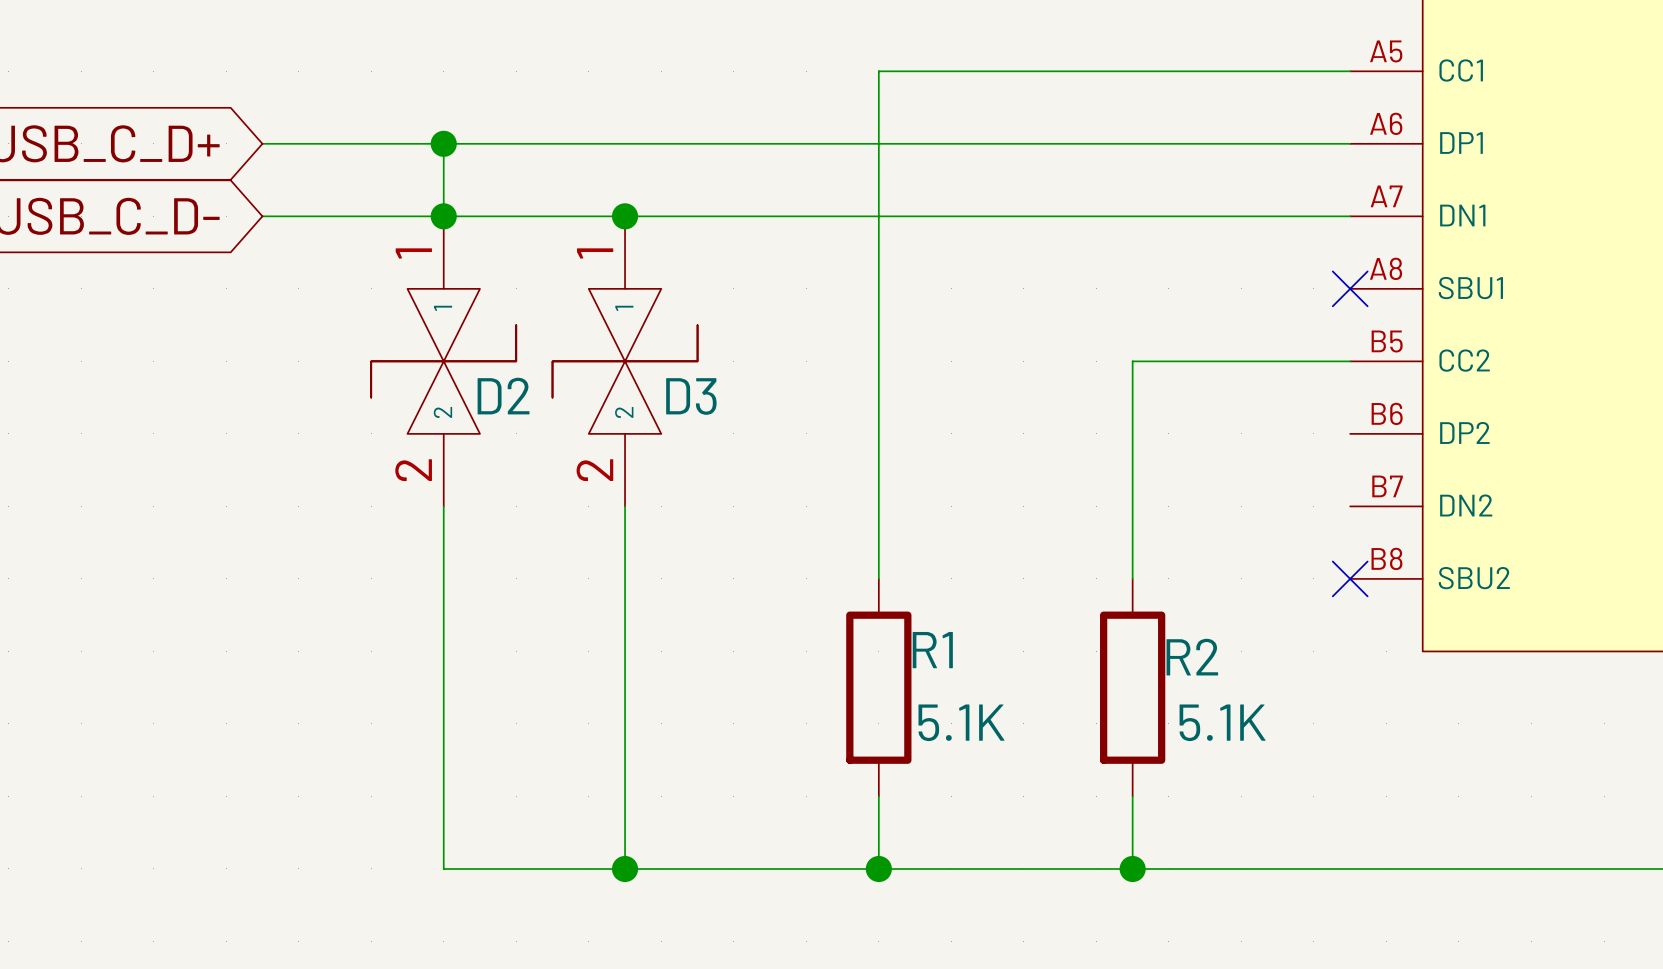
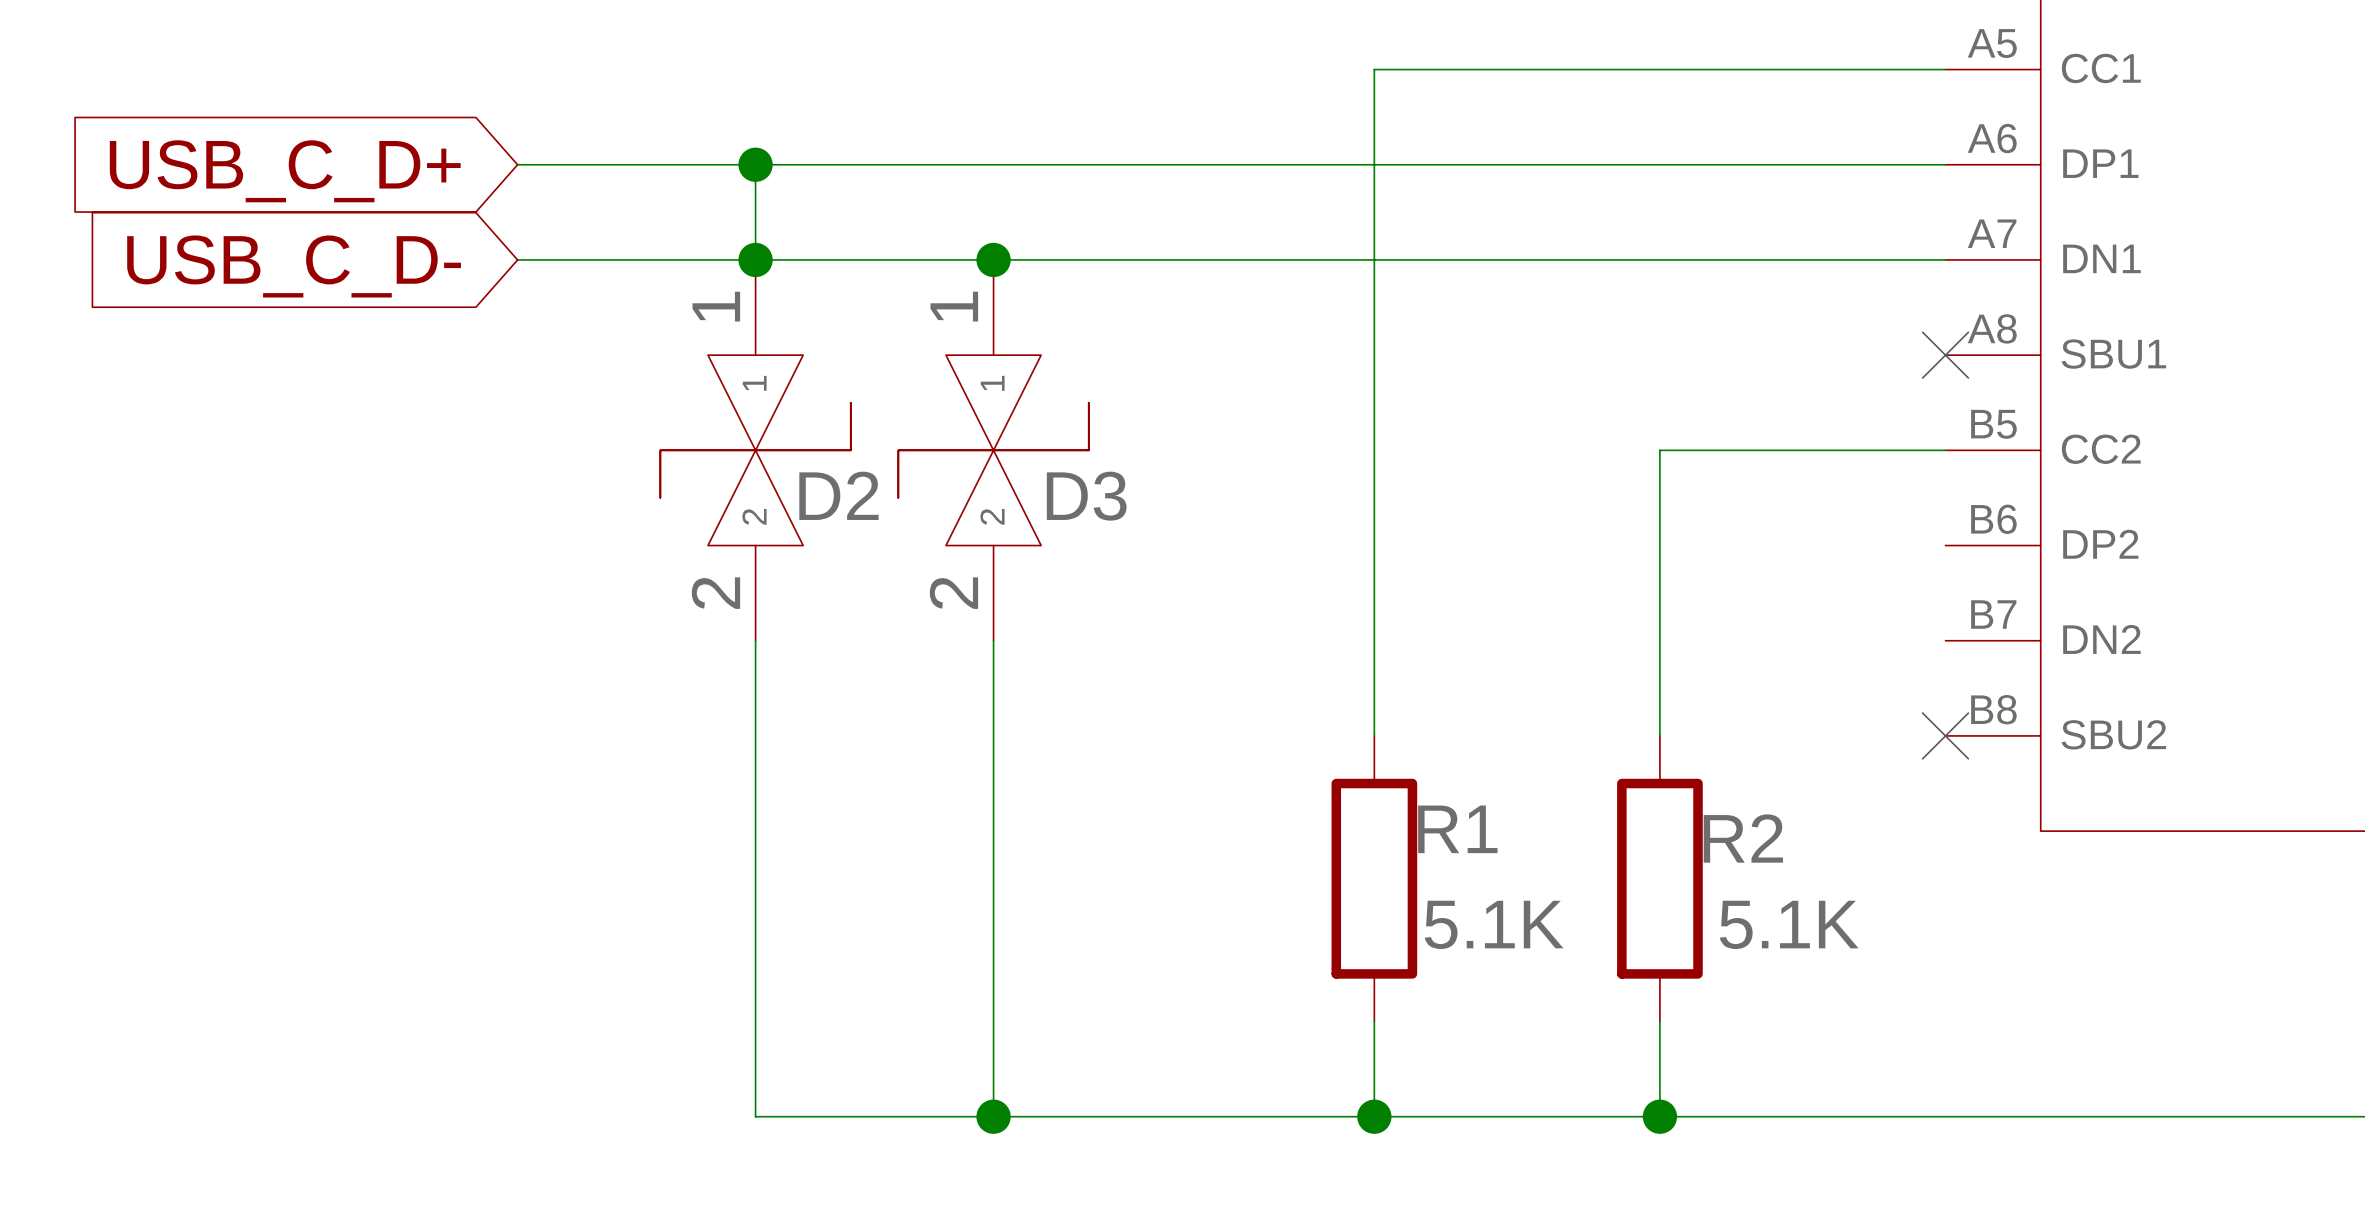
wire: (915, 71) (878, 71) (878, 578) -> (1374, 69) (1374, 735)
R1 position: (878, 687) -> (1374, 878)
wire: (878, 796) (878, 868) -> (1374, 1021) (1374, 1116)
junction position: (878, 868) -> (1374, 1116)

